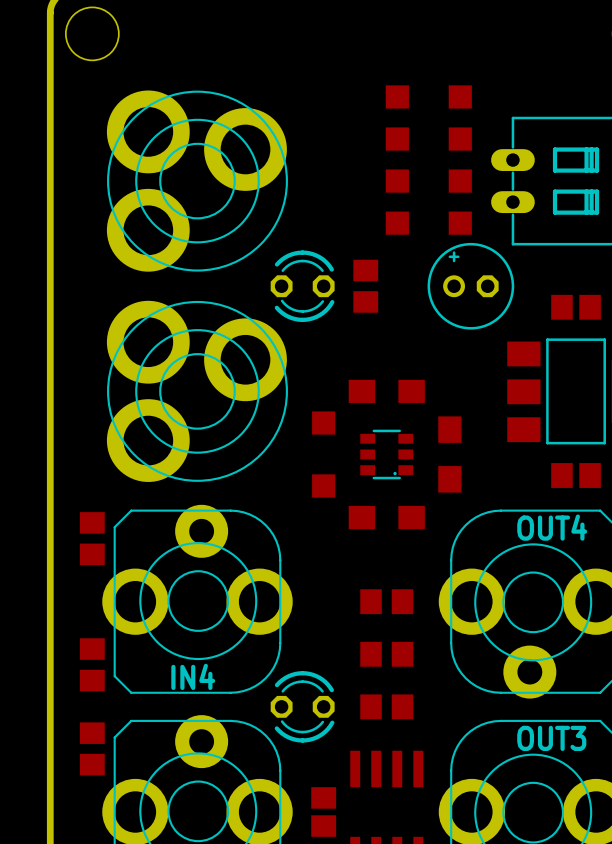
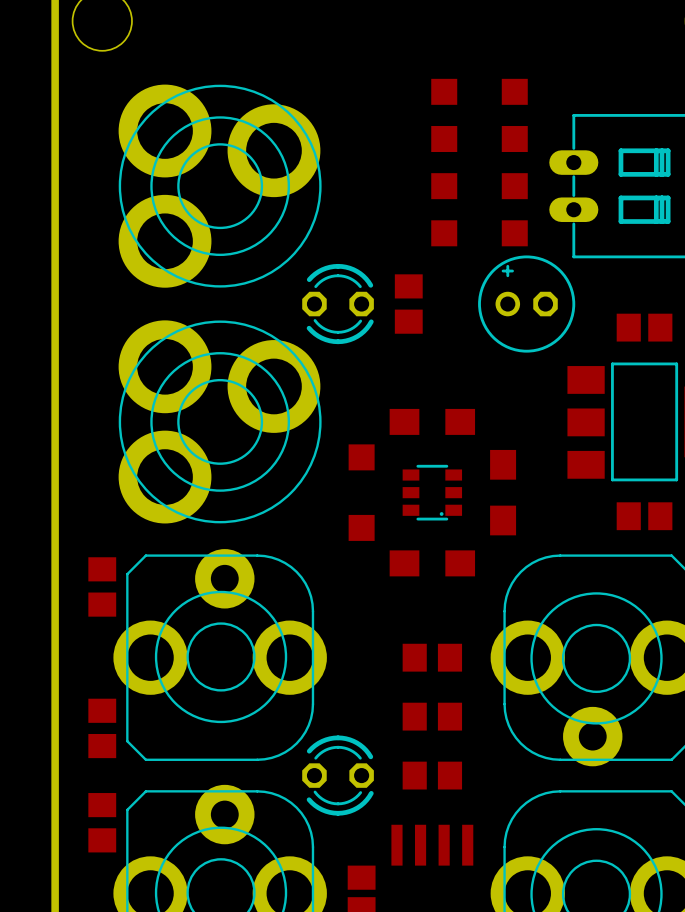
OUT4 name: OUT4 (552, 527) -> none
IN4 name: IN4 (193, 676) -> none
OUT3 name: OUT3 (551, 738) -> none

